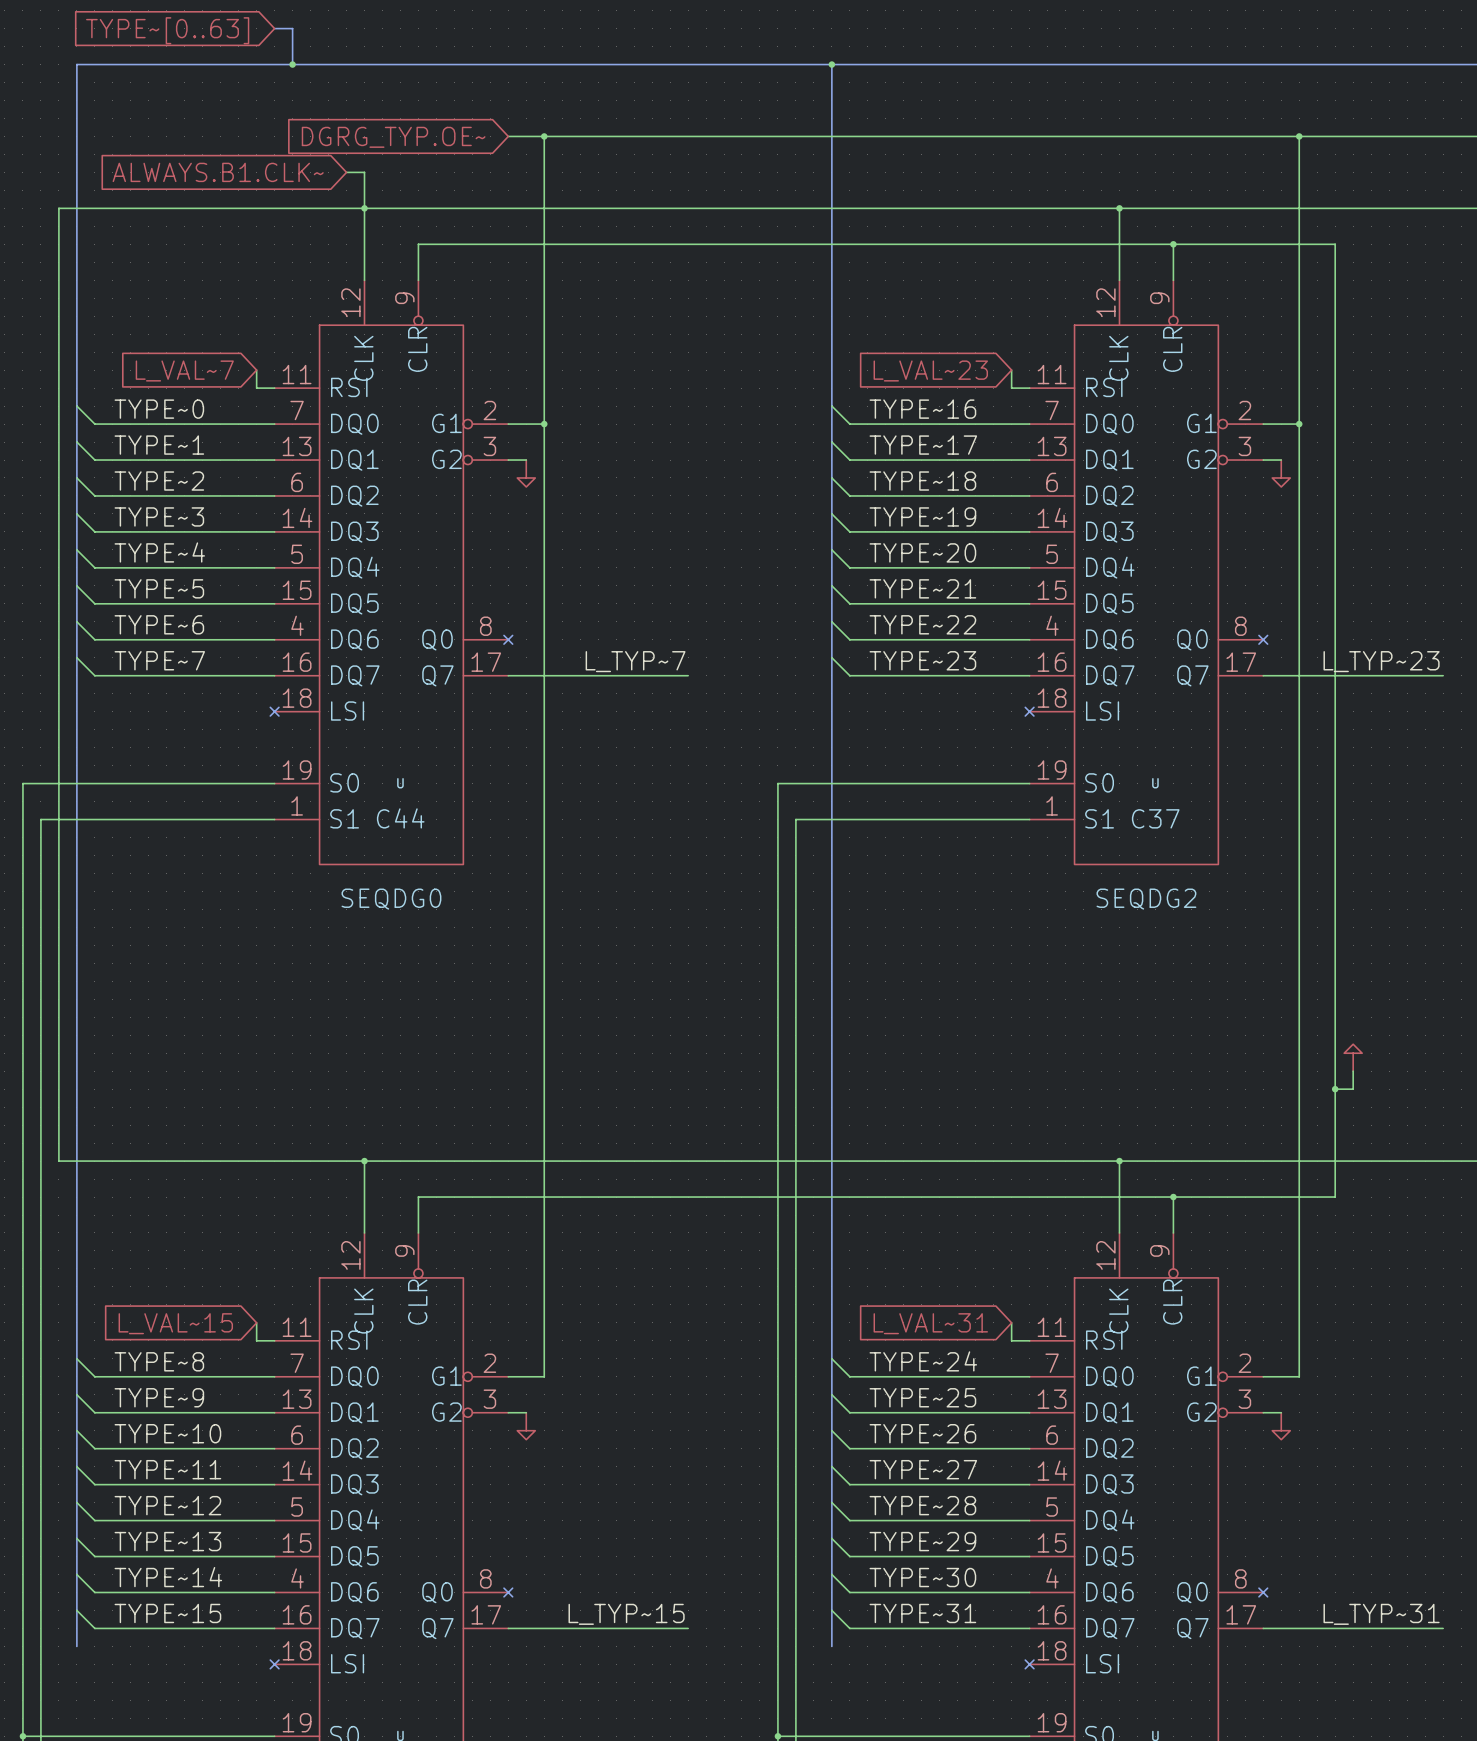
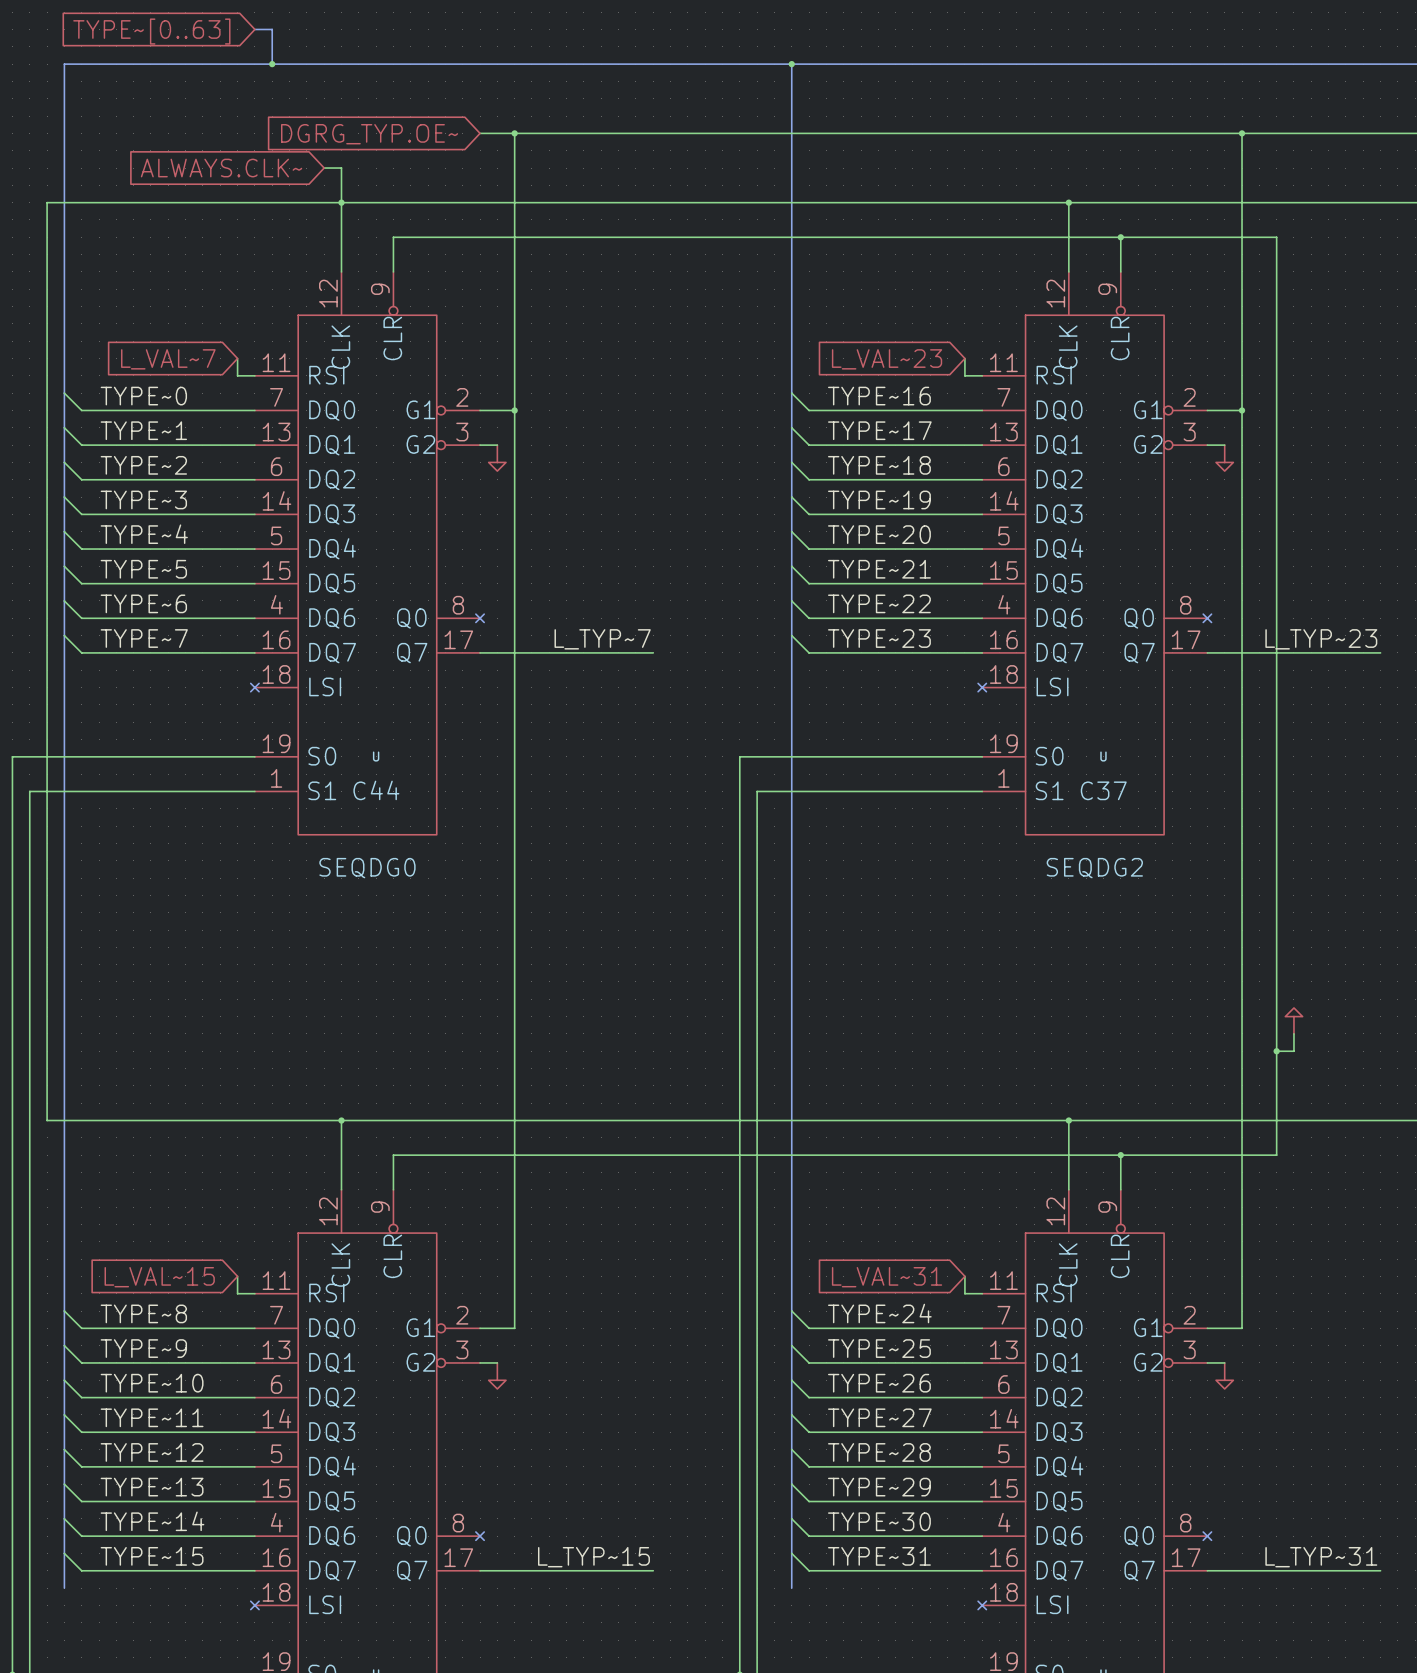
global label: ALWAYS.B1.CLK~ (218, 172) -> ALWAYS.CLK~ (221, 168)

